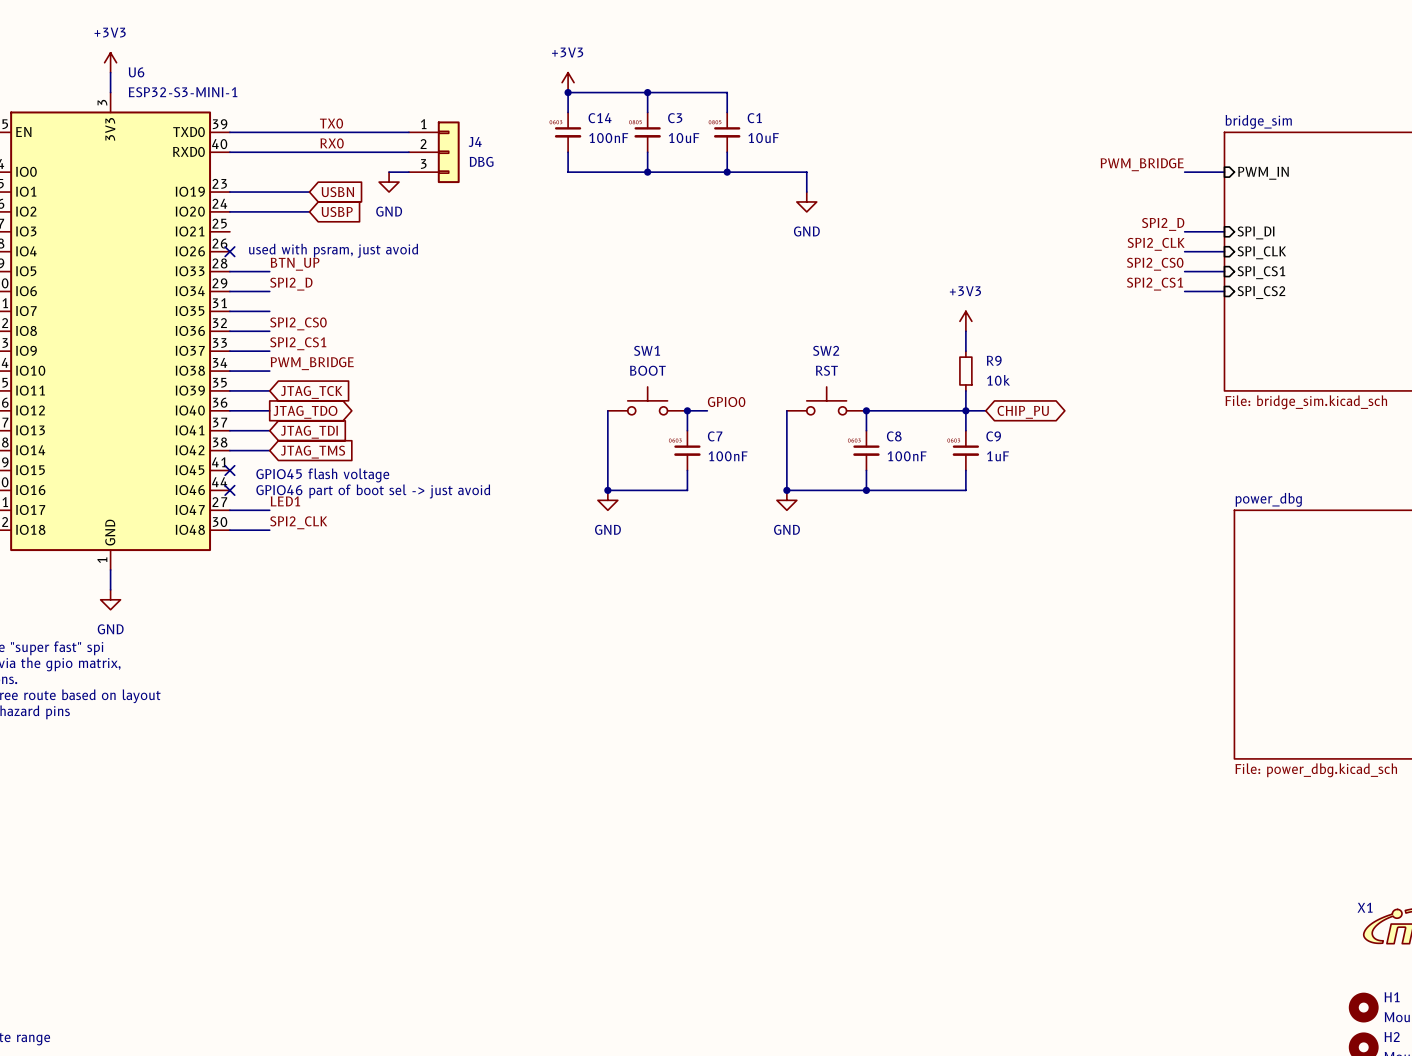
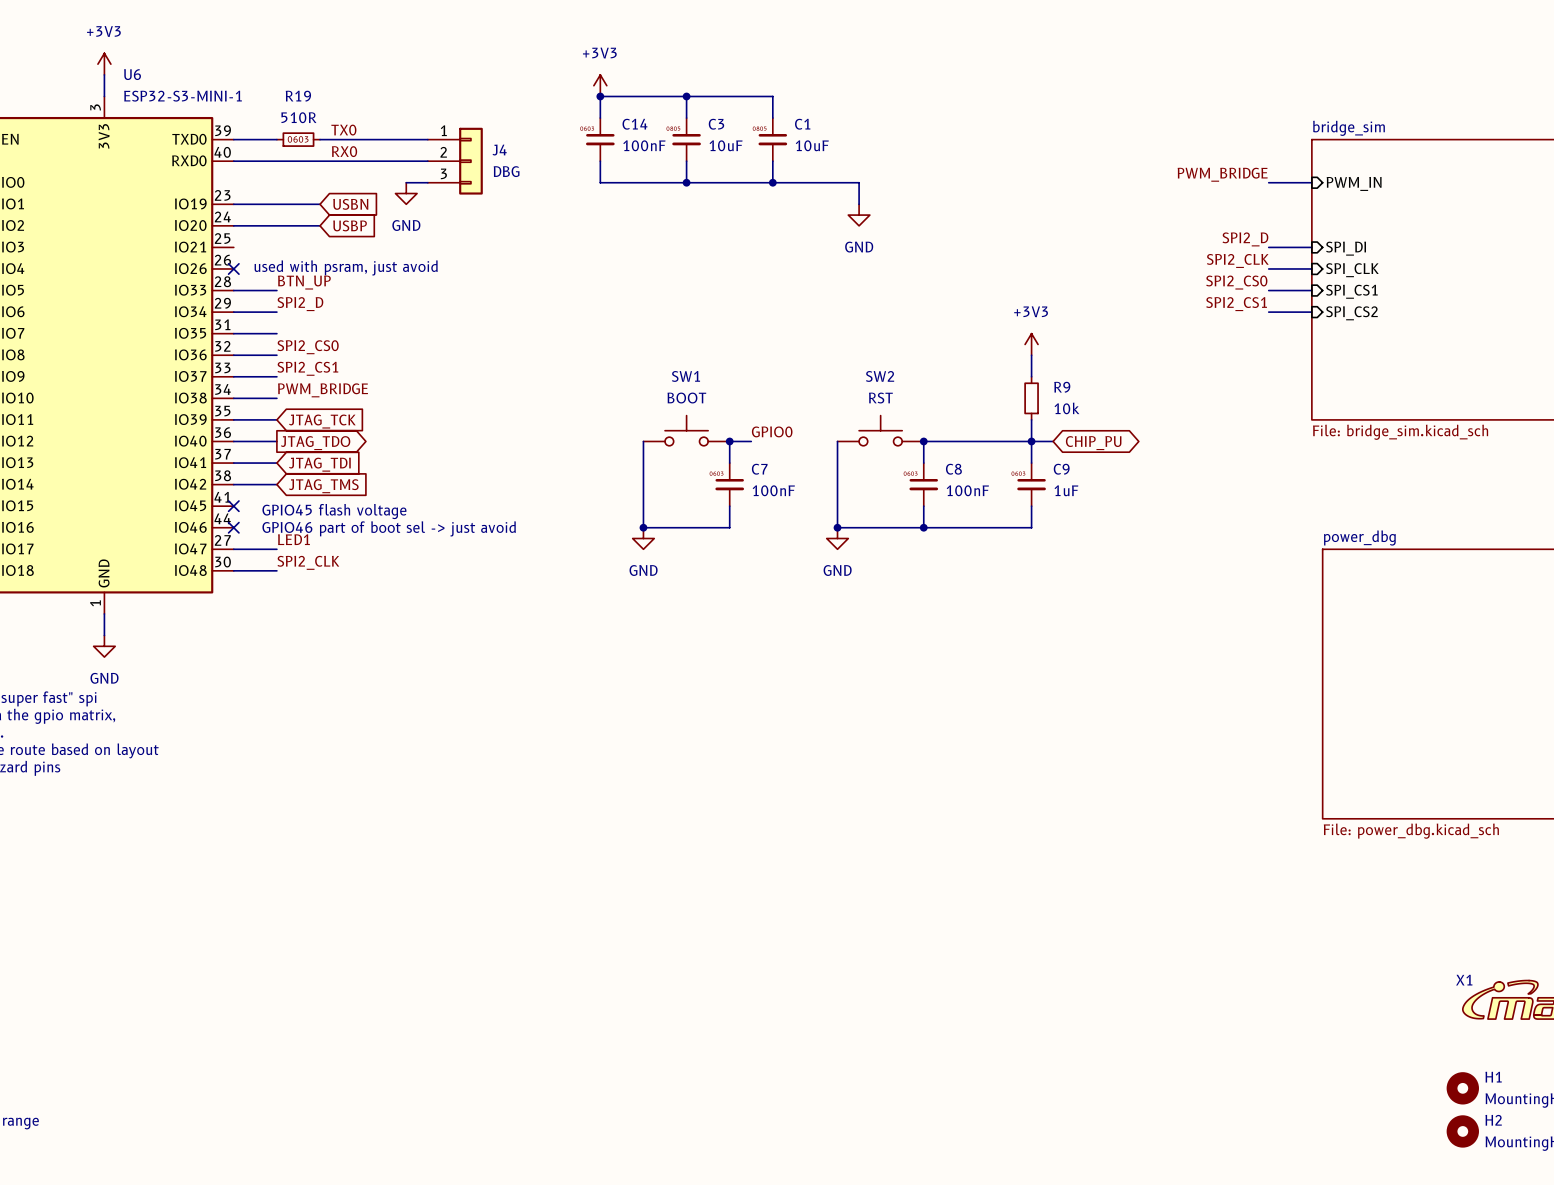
R19: none -> 510R (298, 139)

